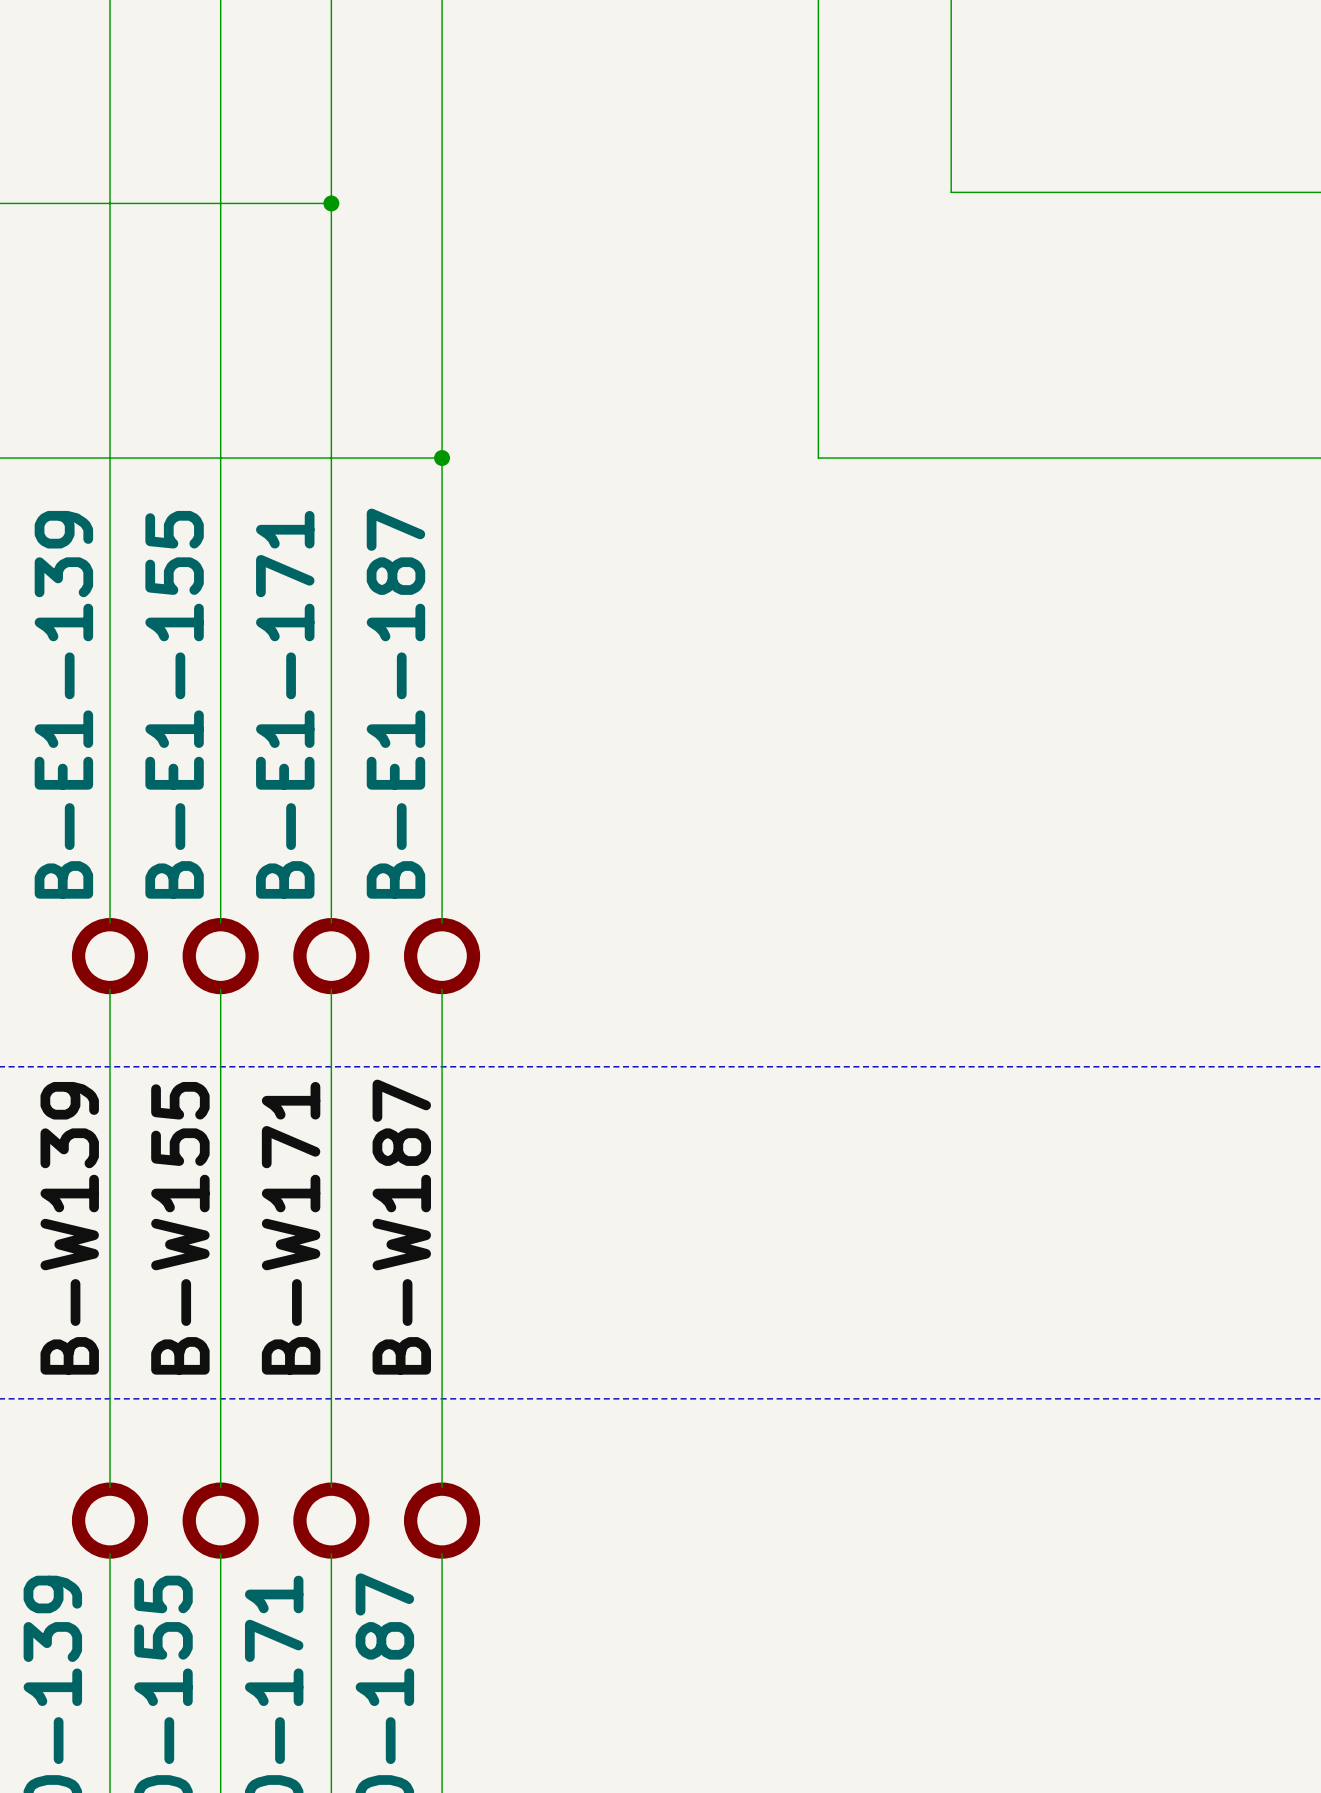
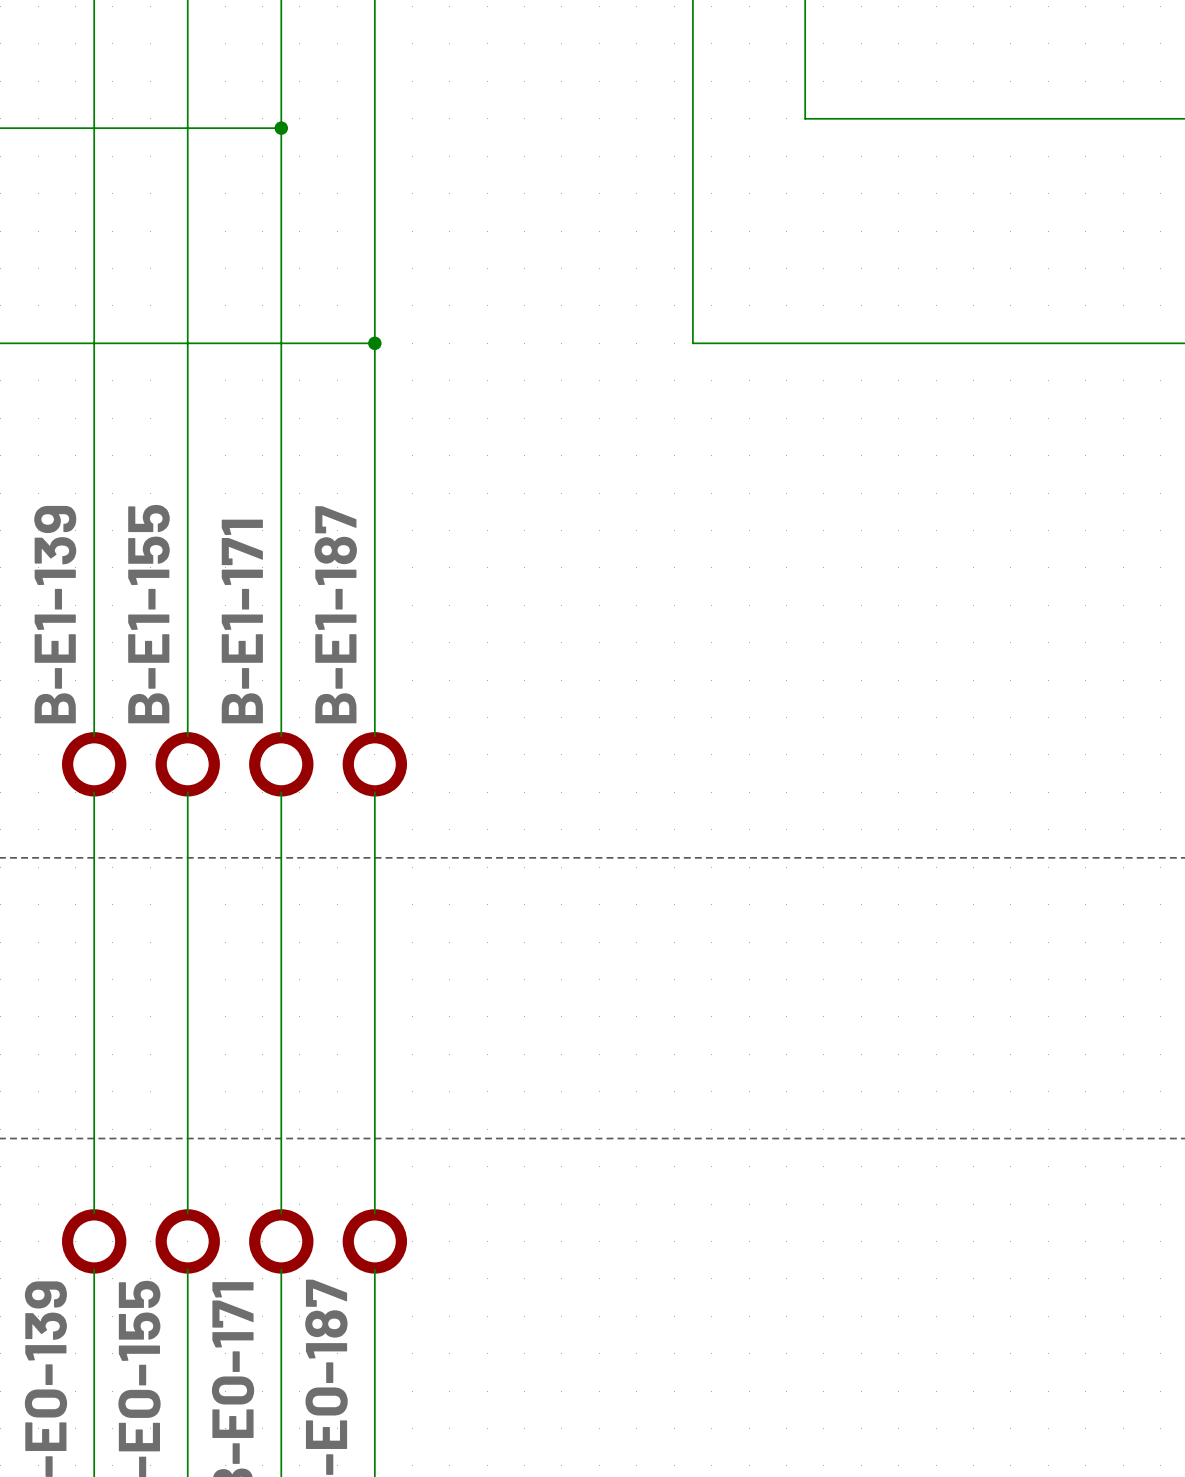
label: B-W187 (401, 1227) -> none
label: B-W139 (69, 1228) -> none
label: B-W155 (180, 1228) -> none
label: B-W171 (291, 1228) -> none

